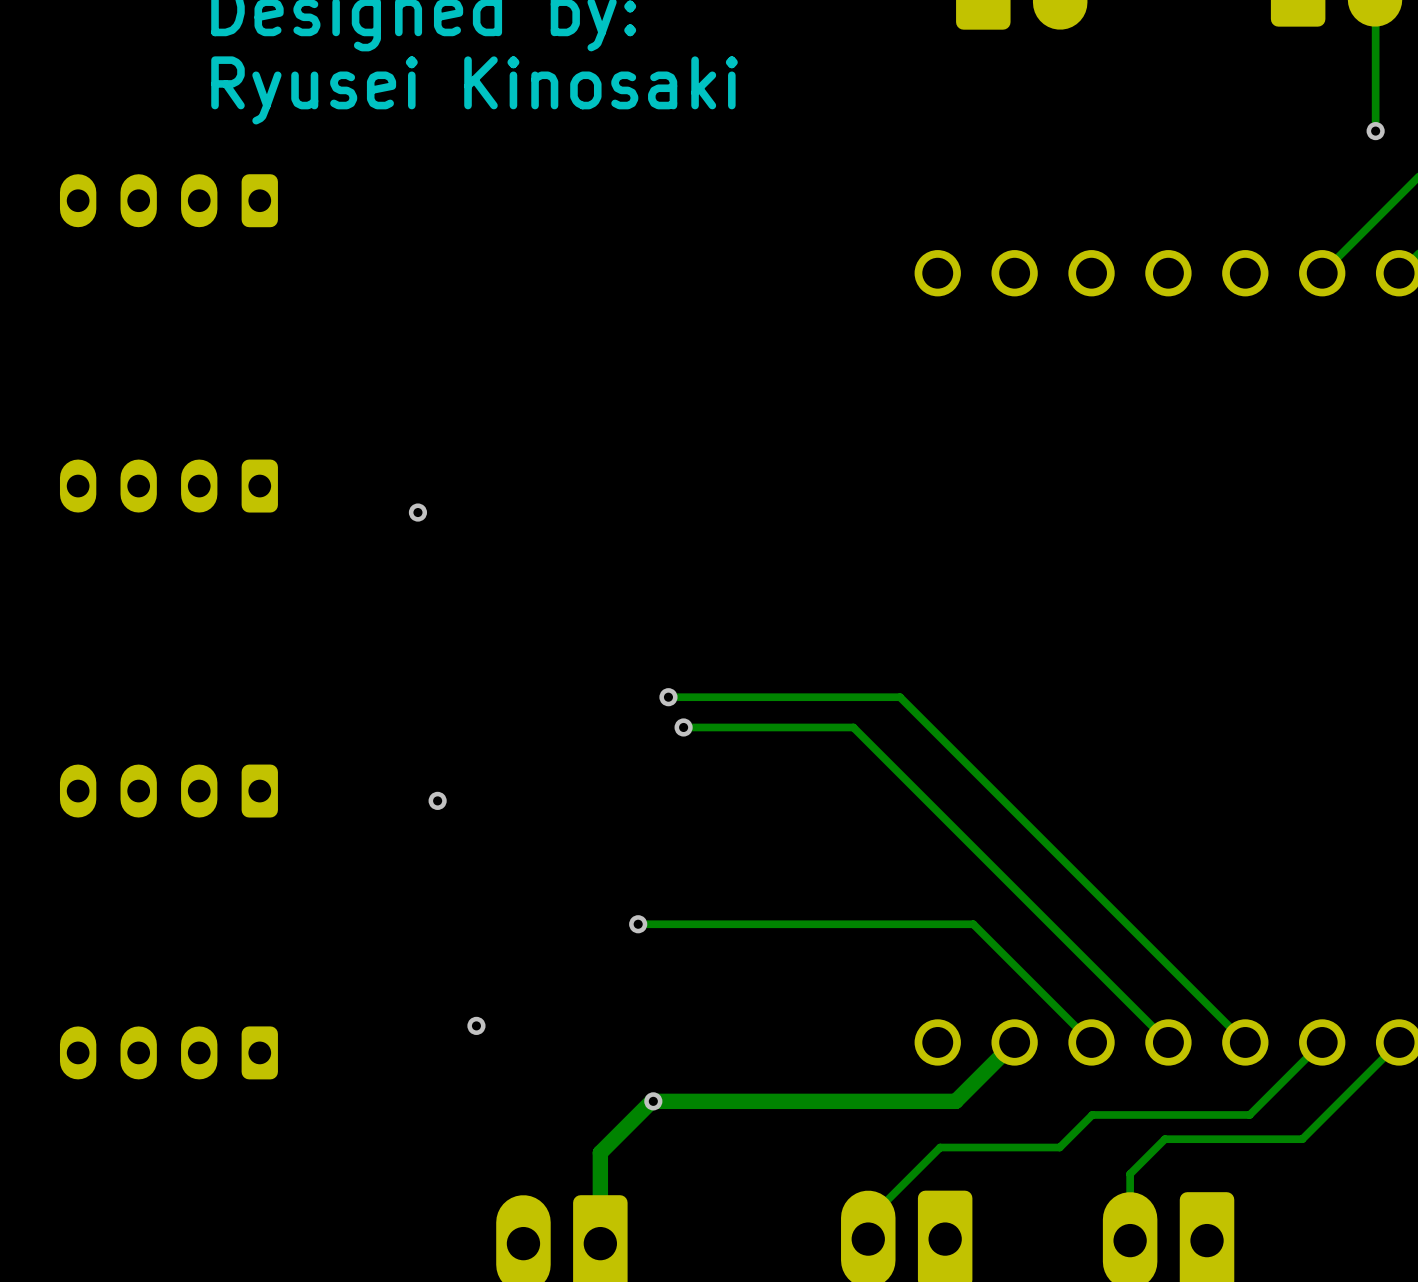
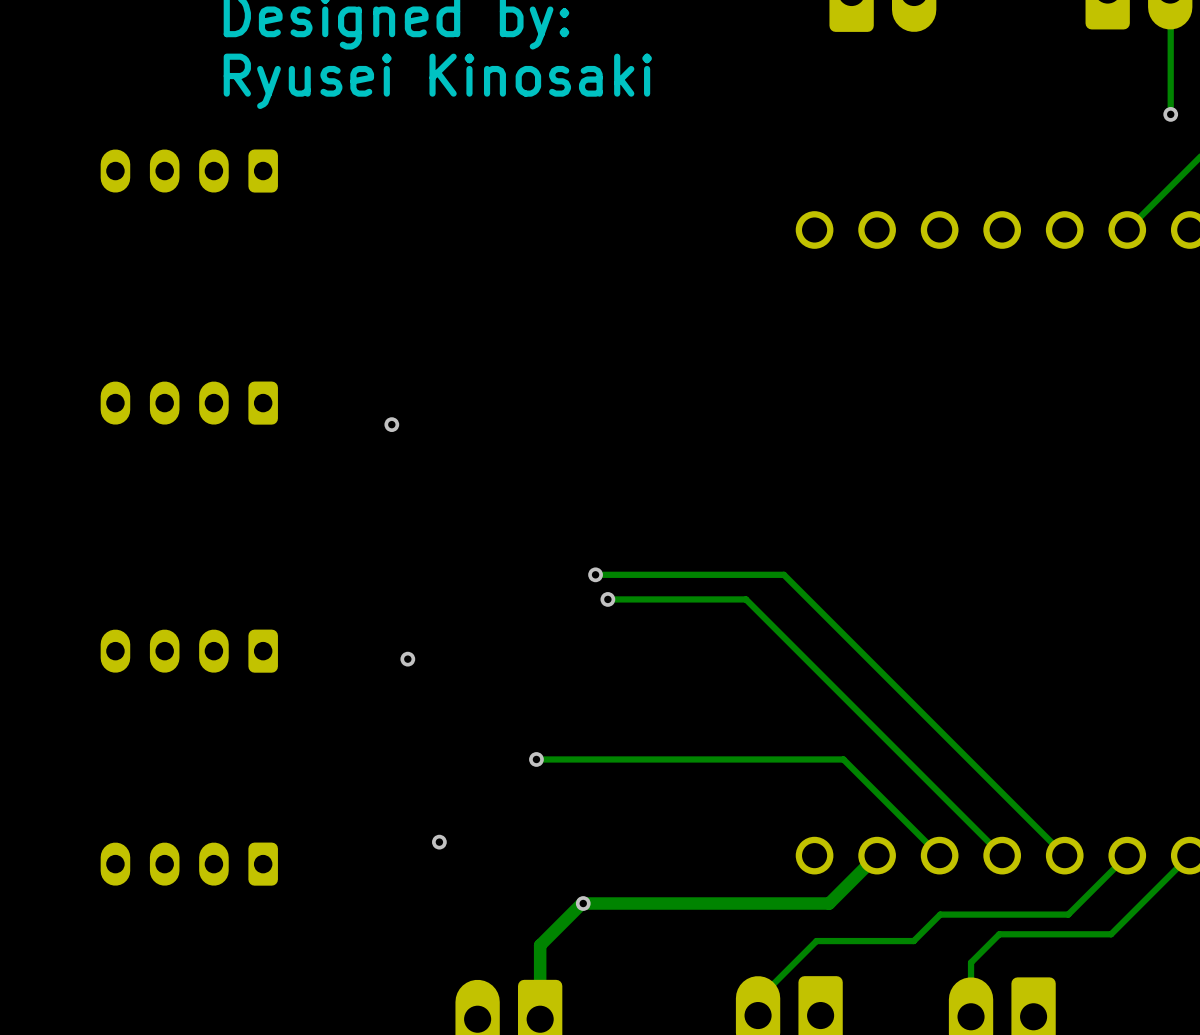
track: none -> (570, 759) (536, 759)
via position: (638, 924) -> (536, 759)

